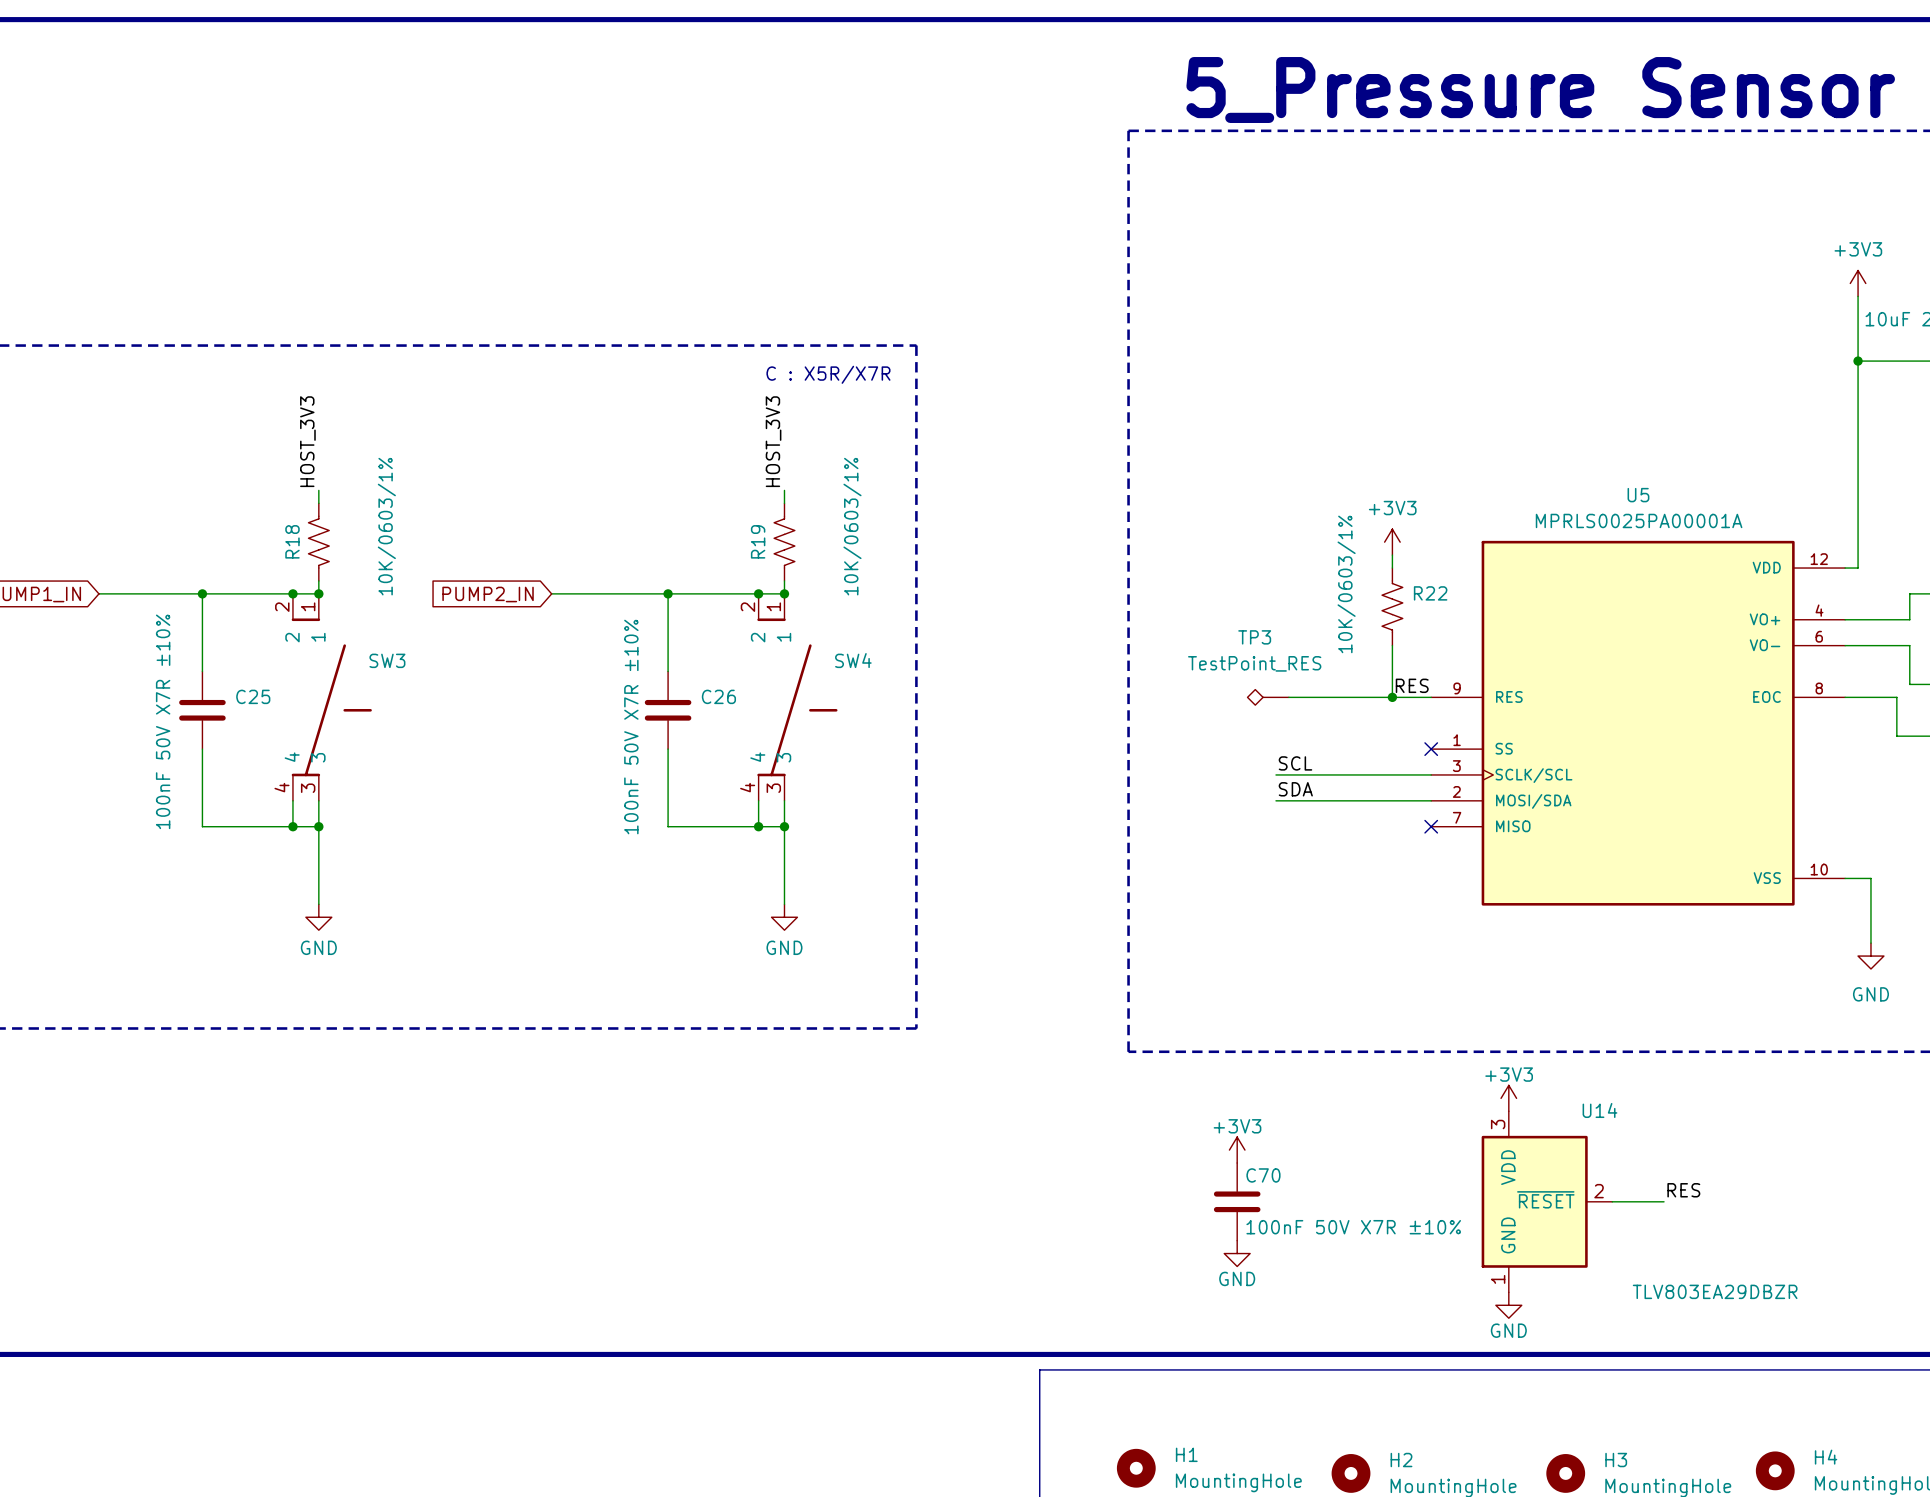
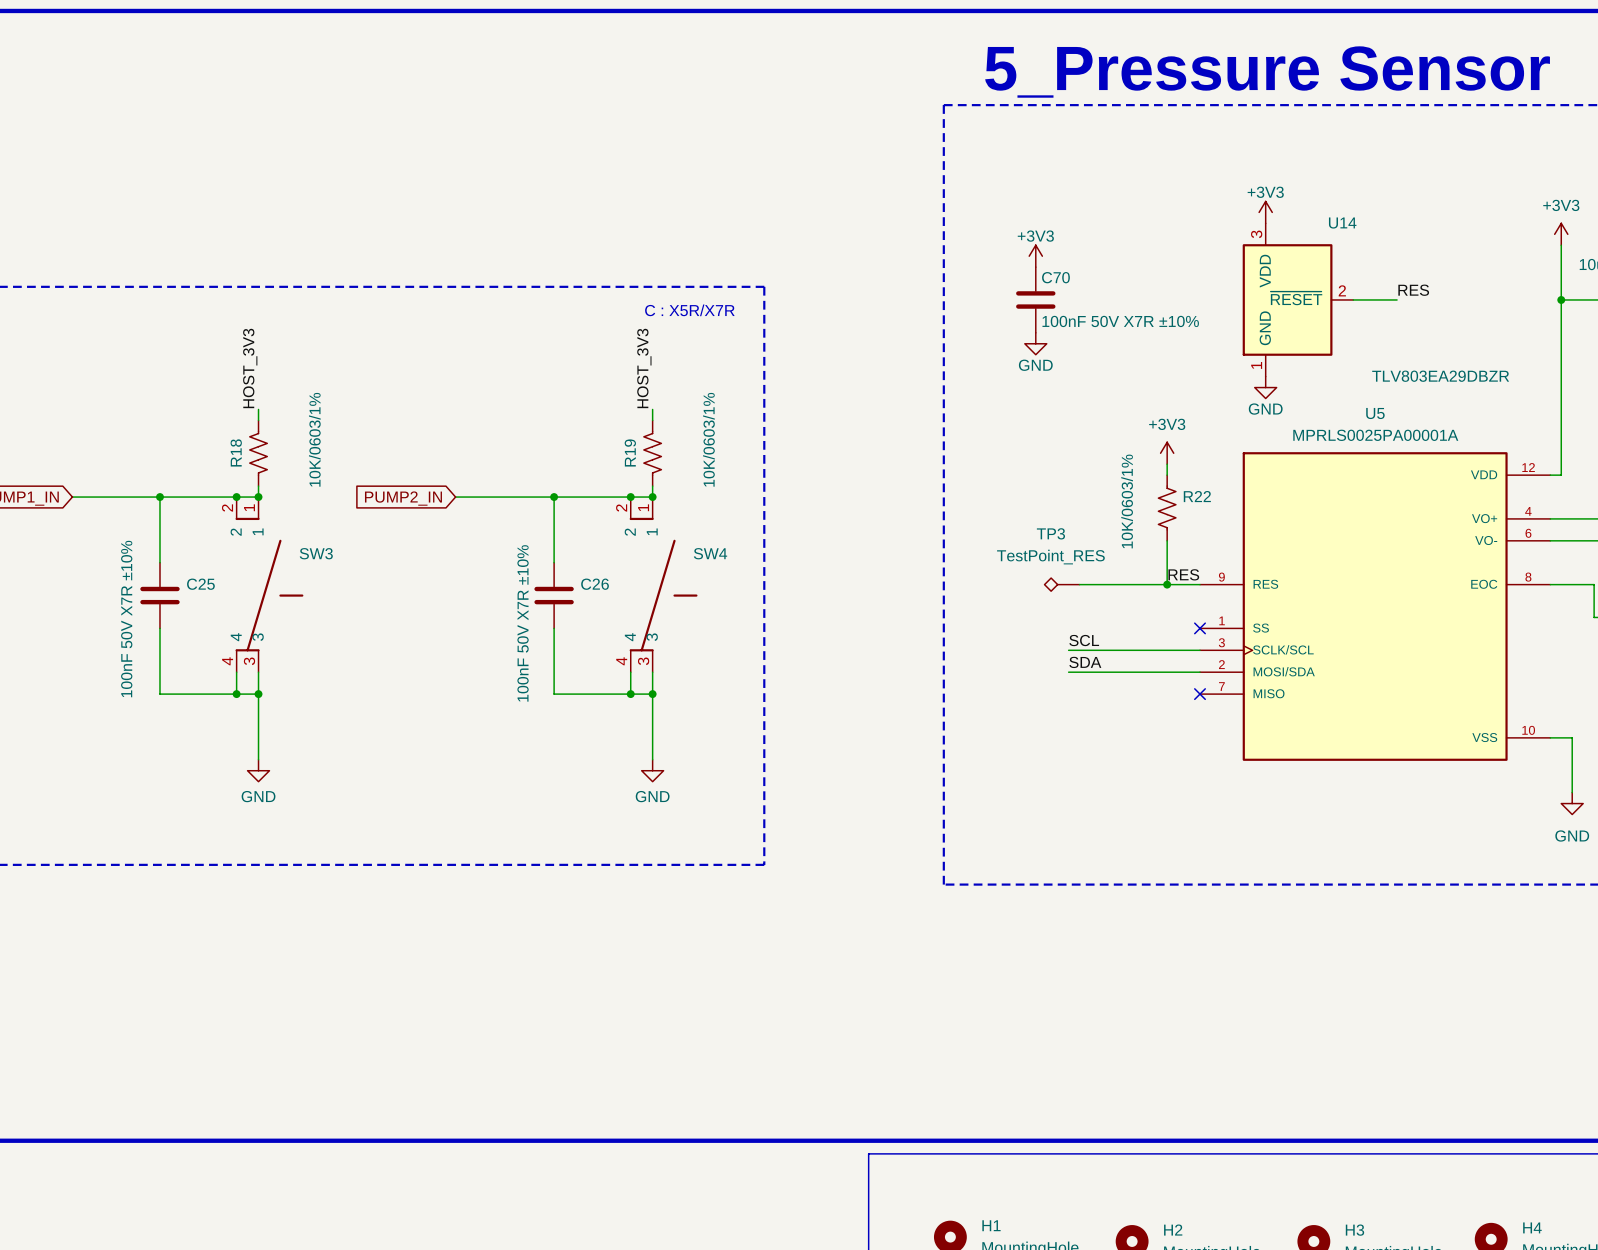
power symbol: none -> +3V3 (1265, 212)
power symbol: none -> +3V3 (1035, 256)
label: none -> RES (1413, 290)
wire: none -> (1353, 299) (1397, 299)
power symbol: none -> GND (1035, 343)
power symbol: none -> GND (1265, 387)
power symbol: +3V3 (1508, 1098) -> none
power symbol: +3V3 (1237, 1150) -> none
label: RES (1683, 1190) -> none
C70 position: (1237, 1201) -> (1035, 299)
U14 position: (1546, 1201) -> (1297, 299)
wire: (1612, 1201) (1664, 1201) -> none
power symbol: GND (1237, 1253) -> none
power symbol: GND (1508, 1305) -> none

